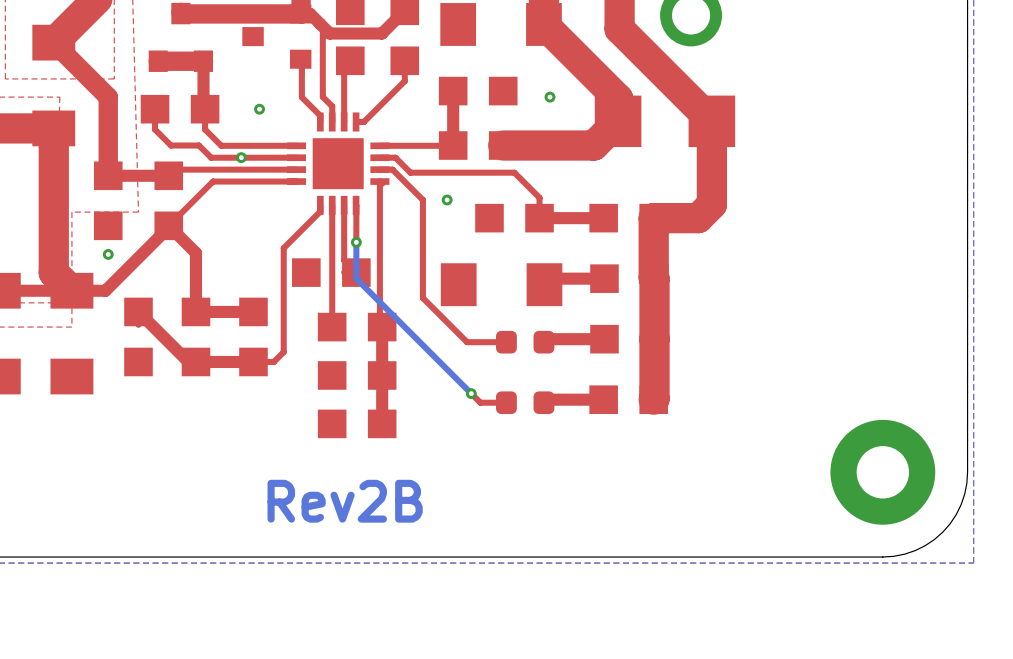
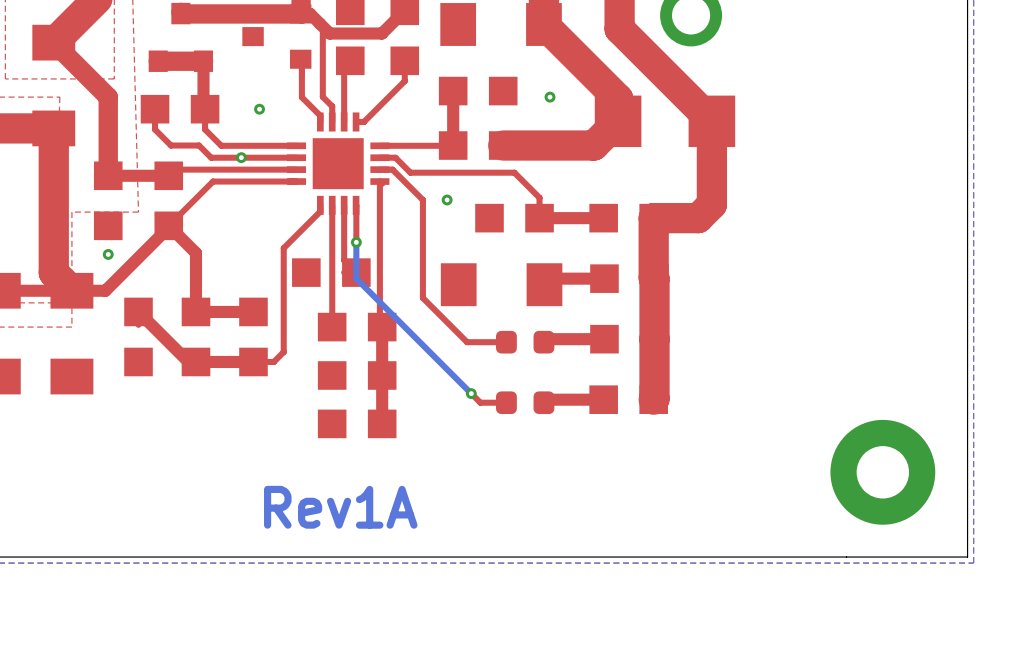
board edge: (967, 472) (961, 504) (942, 532) (915, 550) (882, 557) -> (967, 472) (967, 557) (882, 557)
text: Rev2B (345, 501) -> Rev1A (340, 507)

